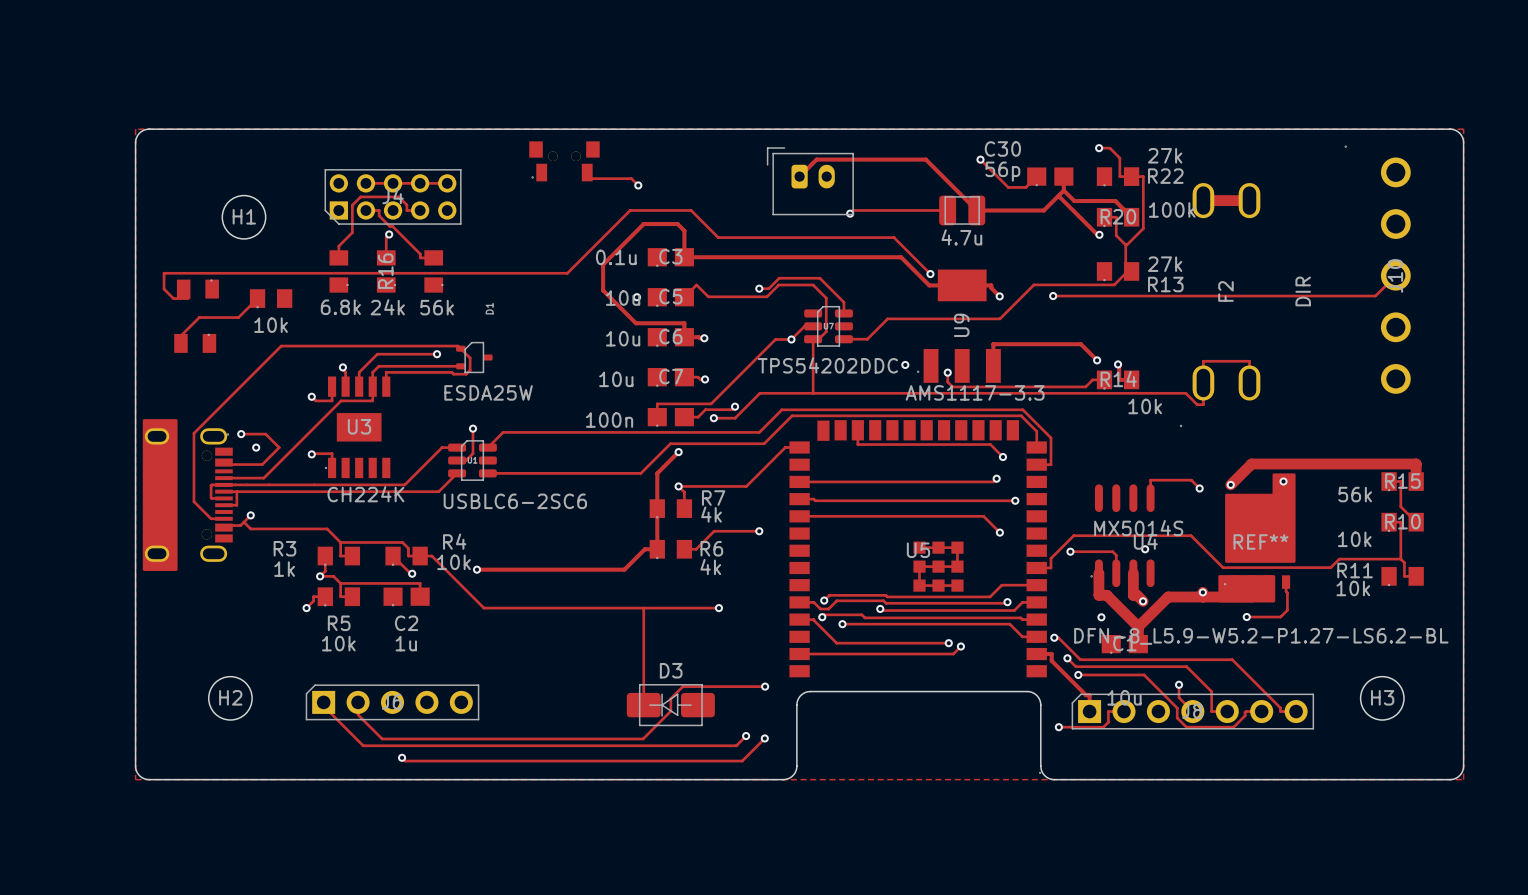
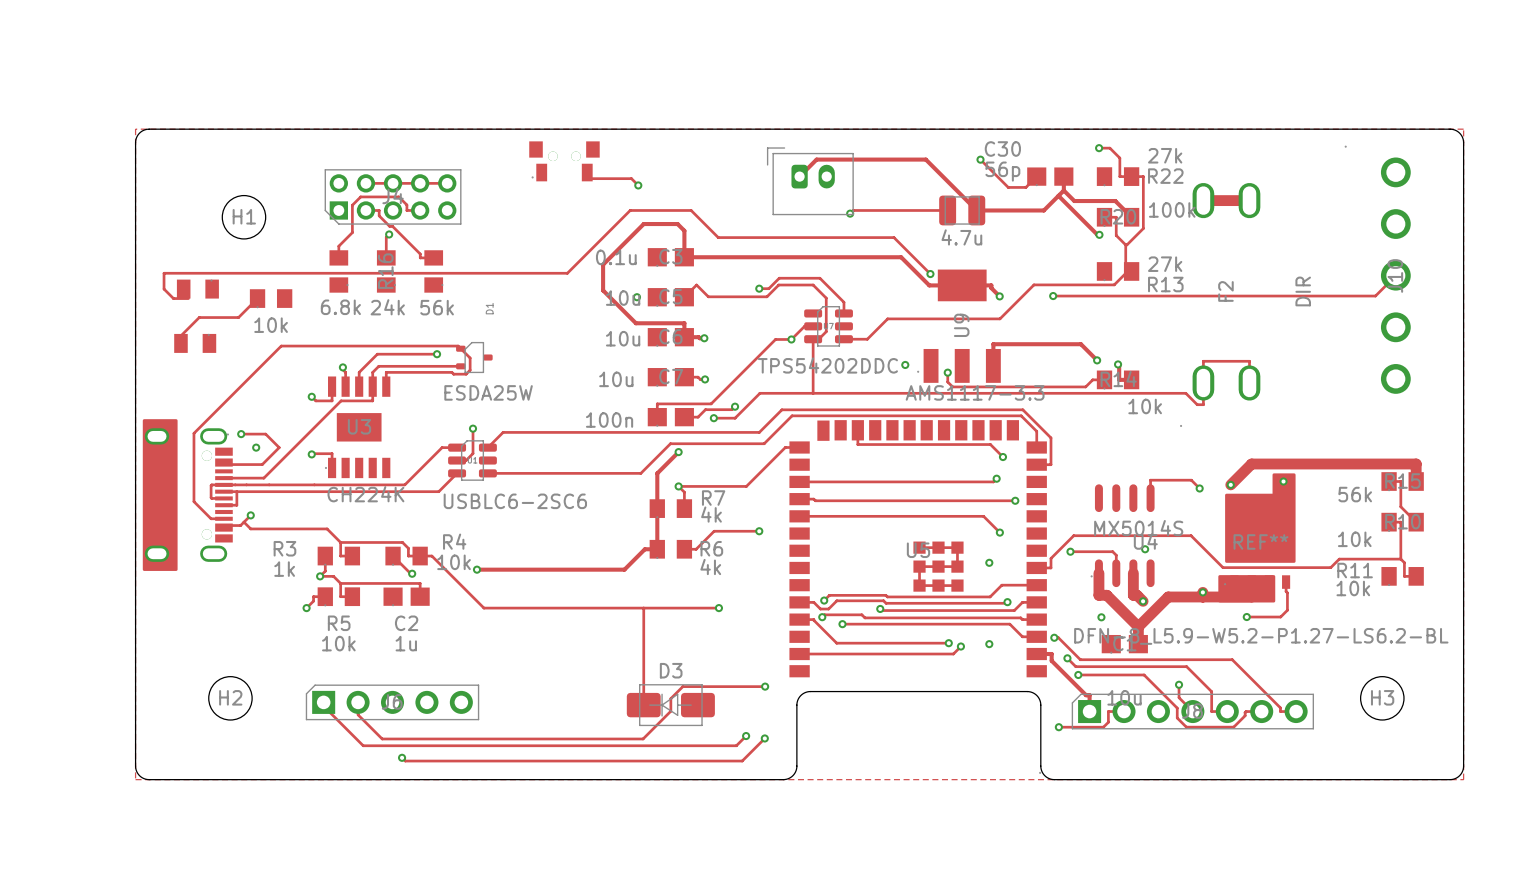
via: none -> (989, 562)
via: none -> (989, 644)

